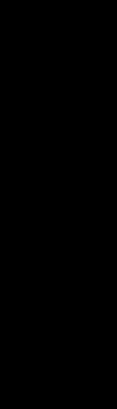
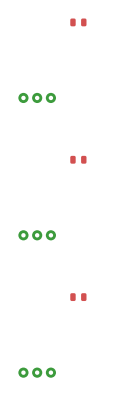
part: none -> (78, 22)
part: none -> (37, 97)
part: none -> (78, 159)
part: none -> (37, 235)
part: none -> (78, 297)
part: none -> (37, 372)

